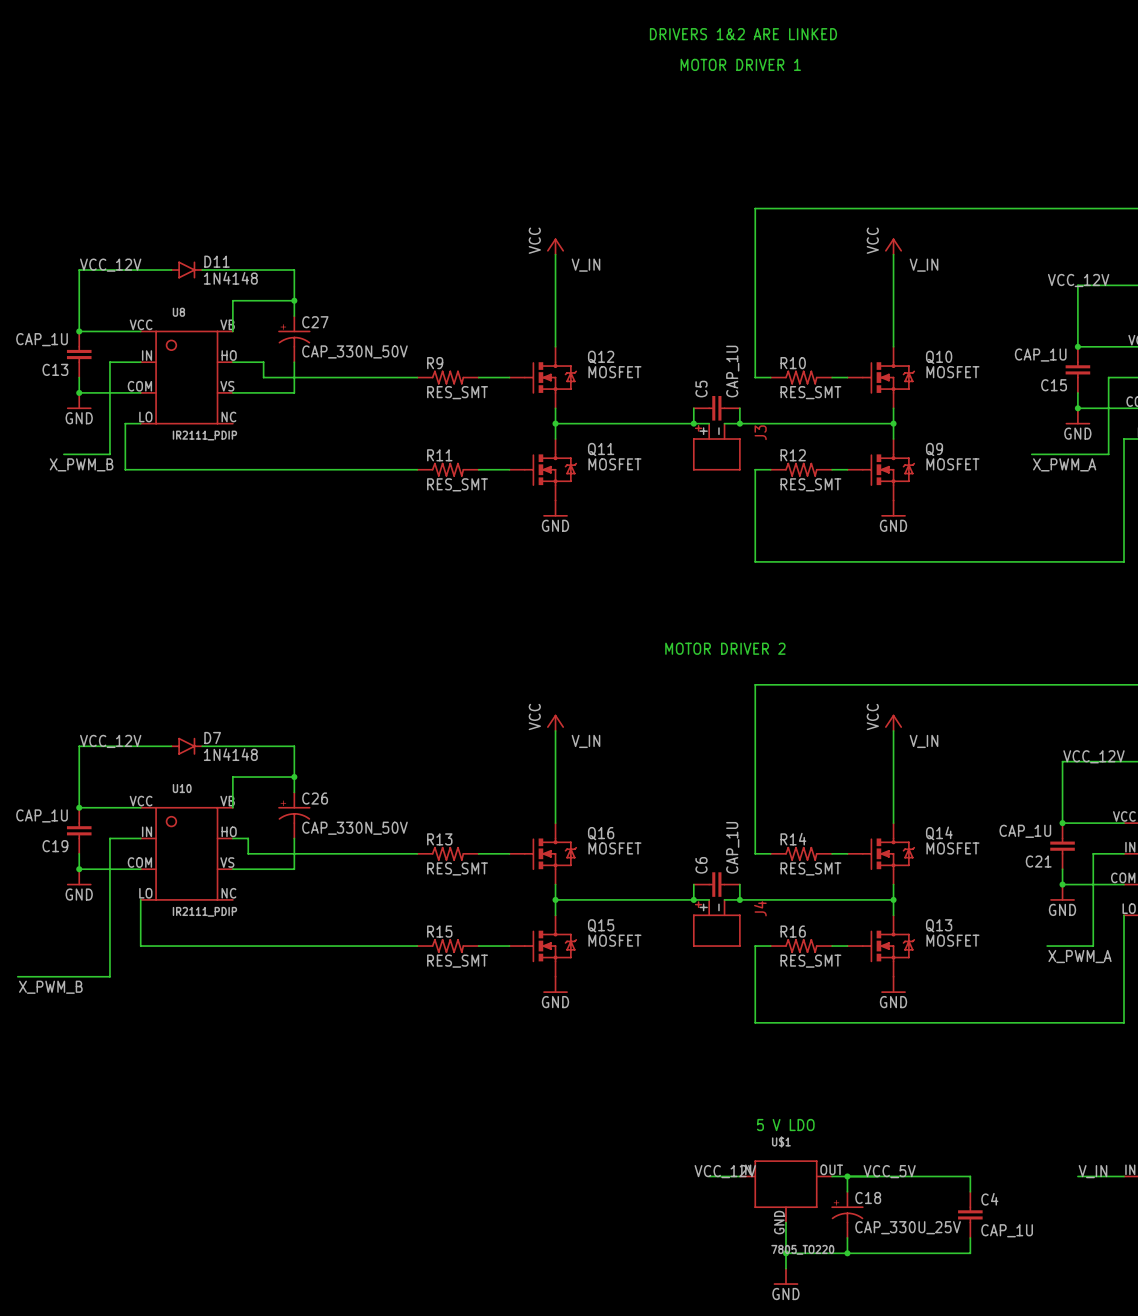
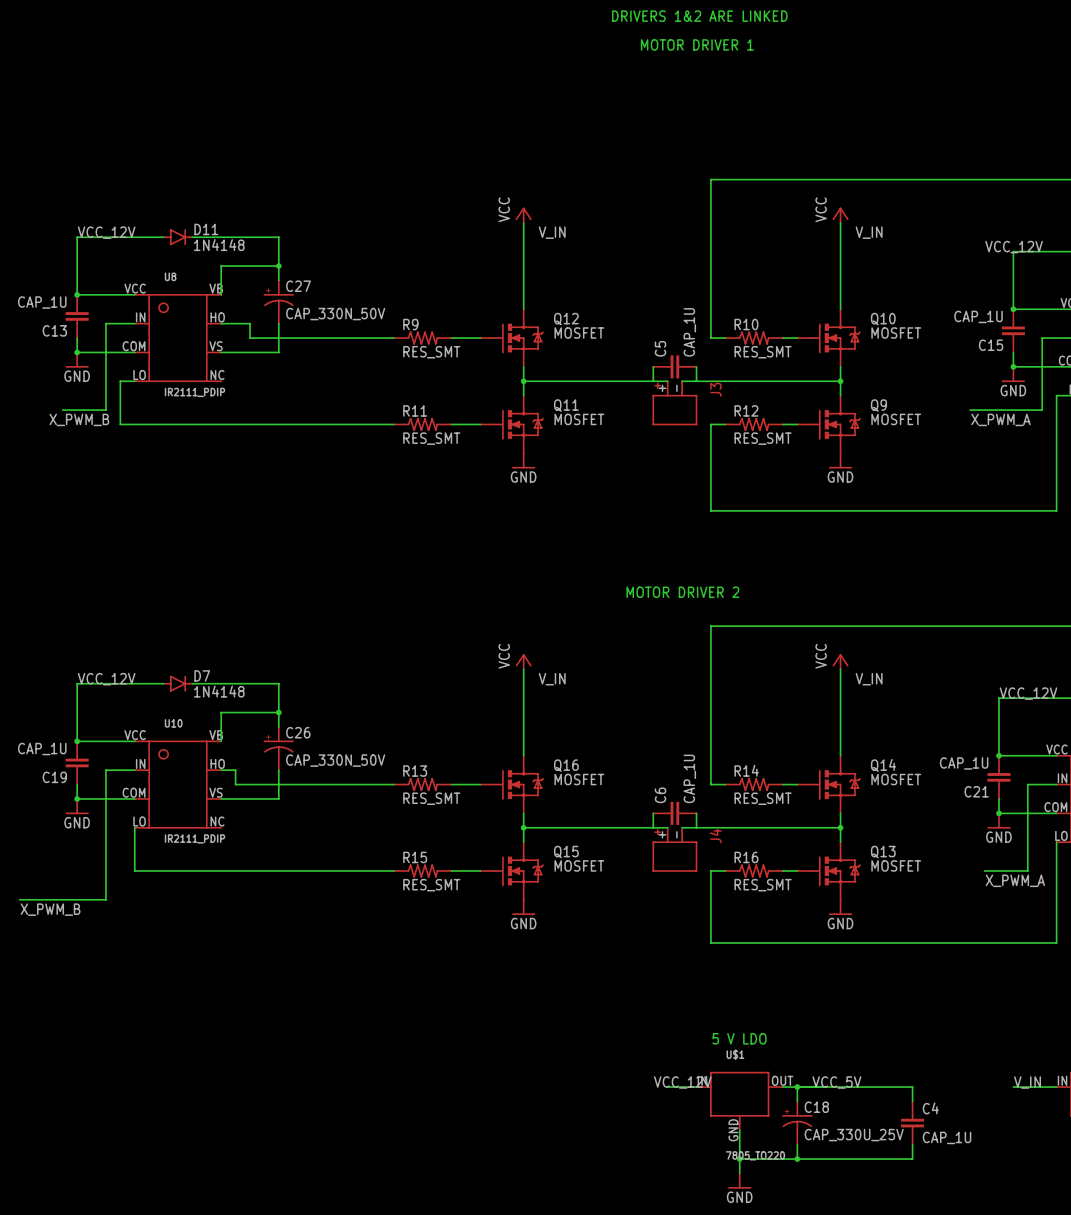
junction: (693, 423) -> none
junction: (739, 423) -> none
junction: (693, 899) -> none
junction: (739, 899) -> none

